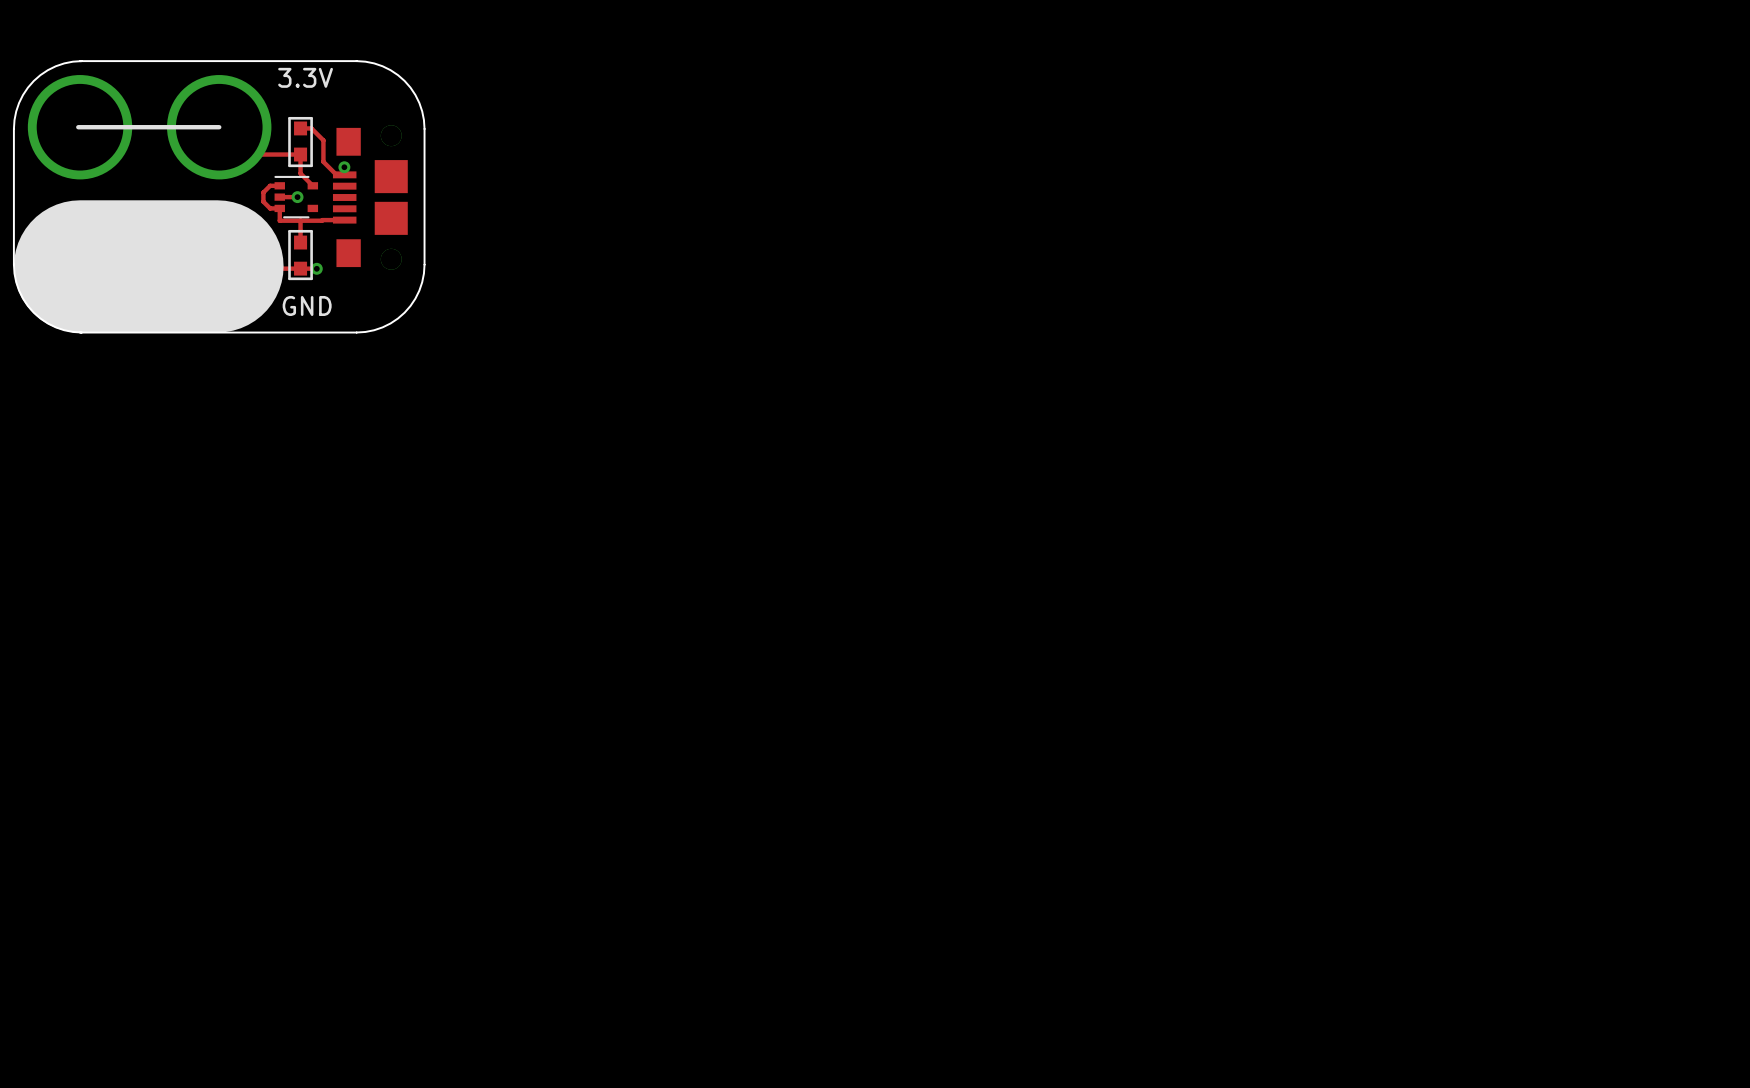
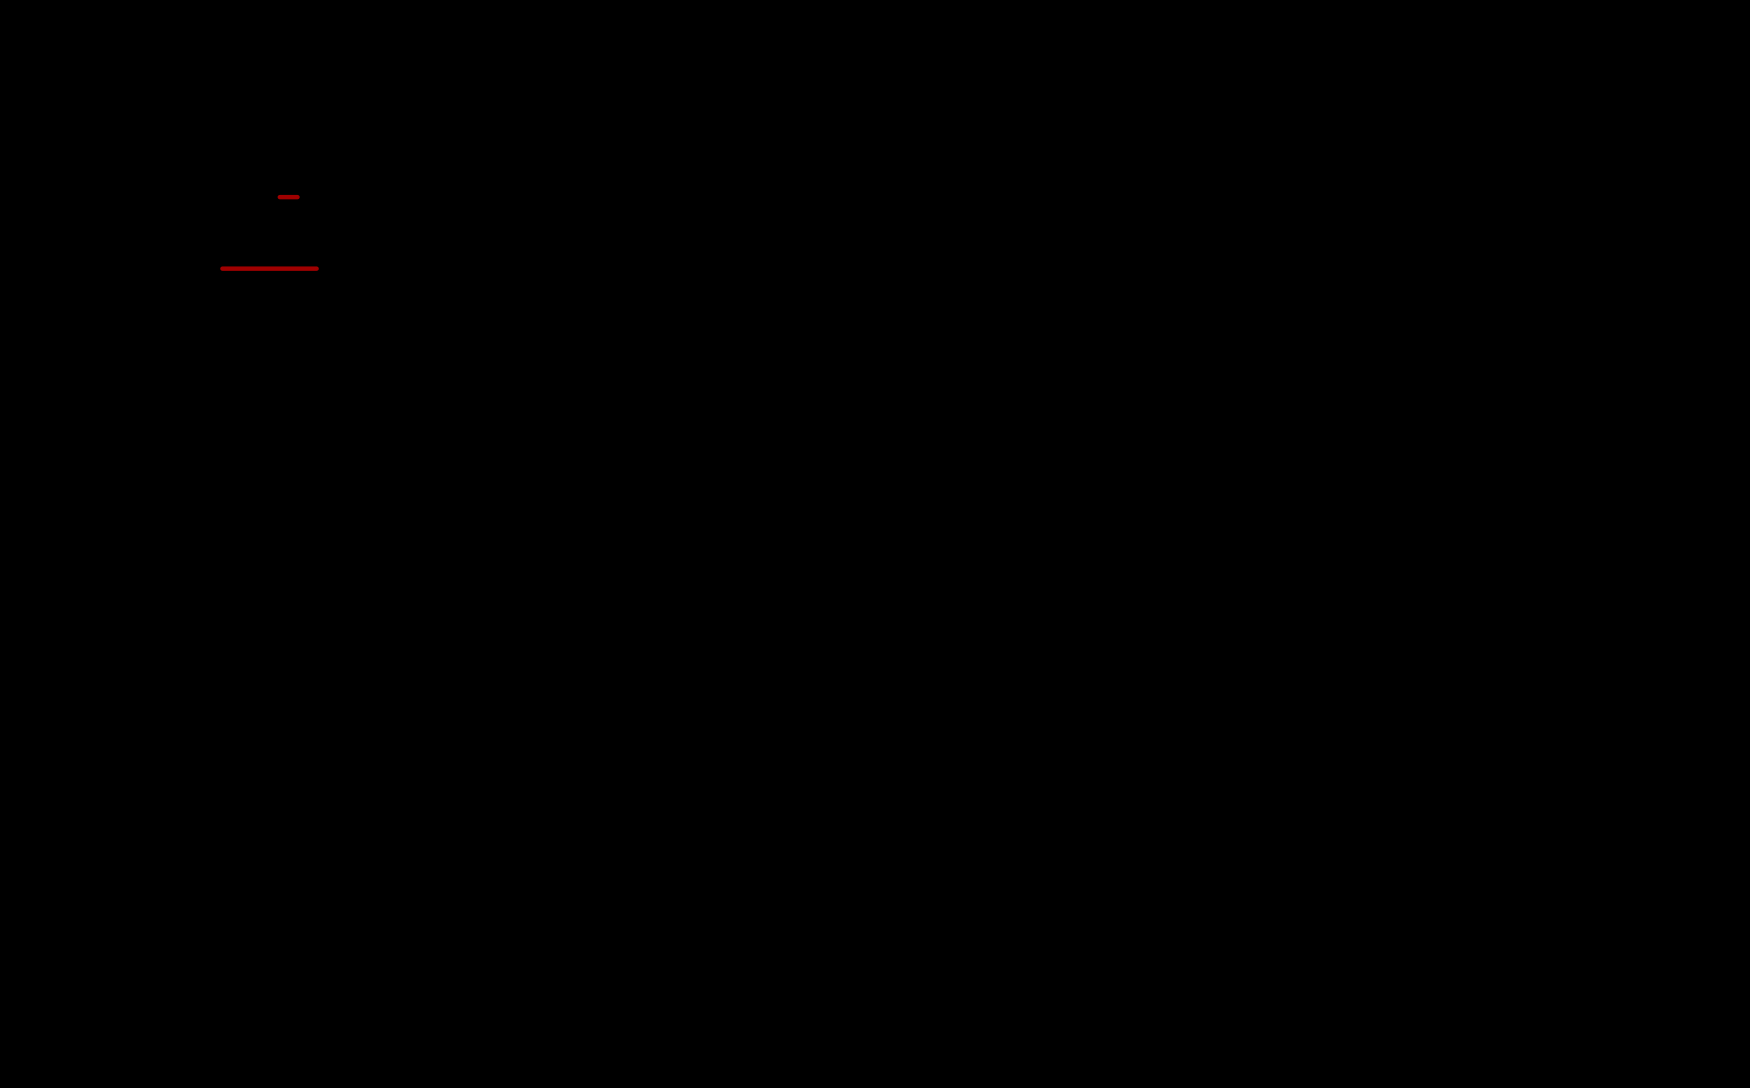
track: (300, 128) (311, 128) (323, 140) (323, 161) (336, 174) (344, 174) (344, 167) -> none
part: (300, 142) -> none
track: (250, 154) (300, 154) (300, 173) (312, 185) -> none
via: (344, 167) -> none
track: (279, 185) (270, 185) (263, 192) (263, 201) (270, 208) (279, 208) (279, 220) (344, 220) -> none
part: (219, 196) -> none
part: (296, 197) -> none
via: (297, 197) -> none
part: (370, 197) -> none
track: (300, 220) (300, 242) -> none
part: (300, 255) -> none
via: (316, 268) -> none

